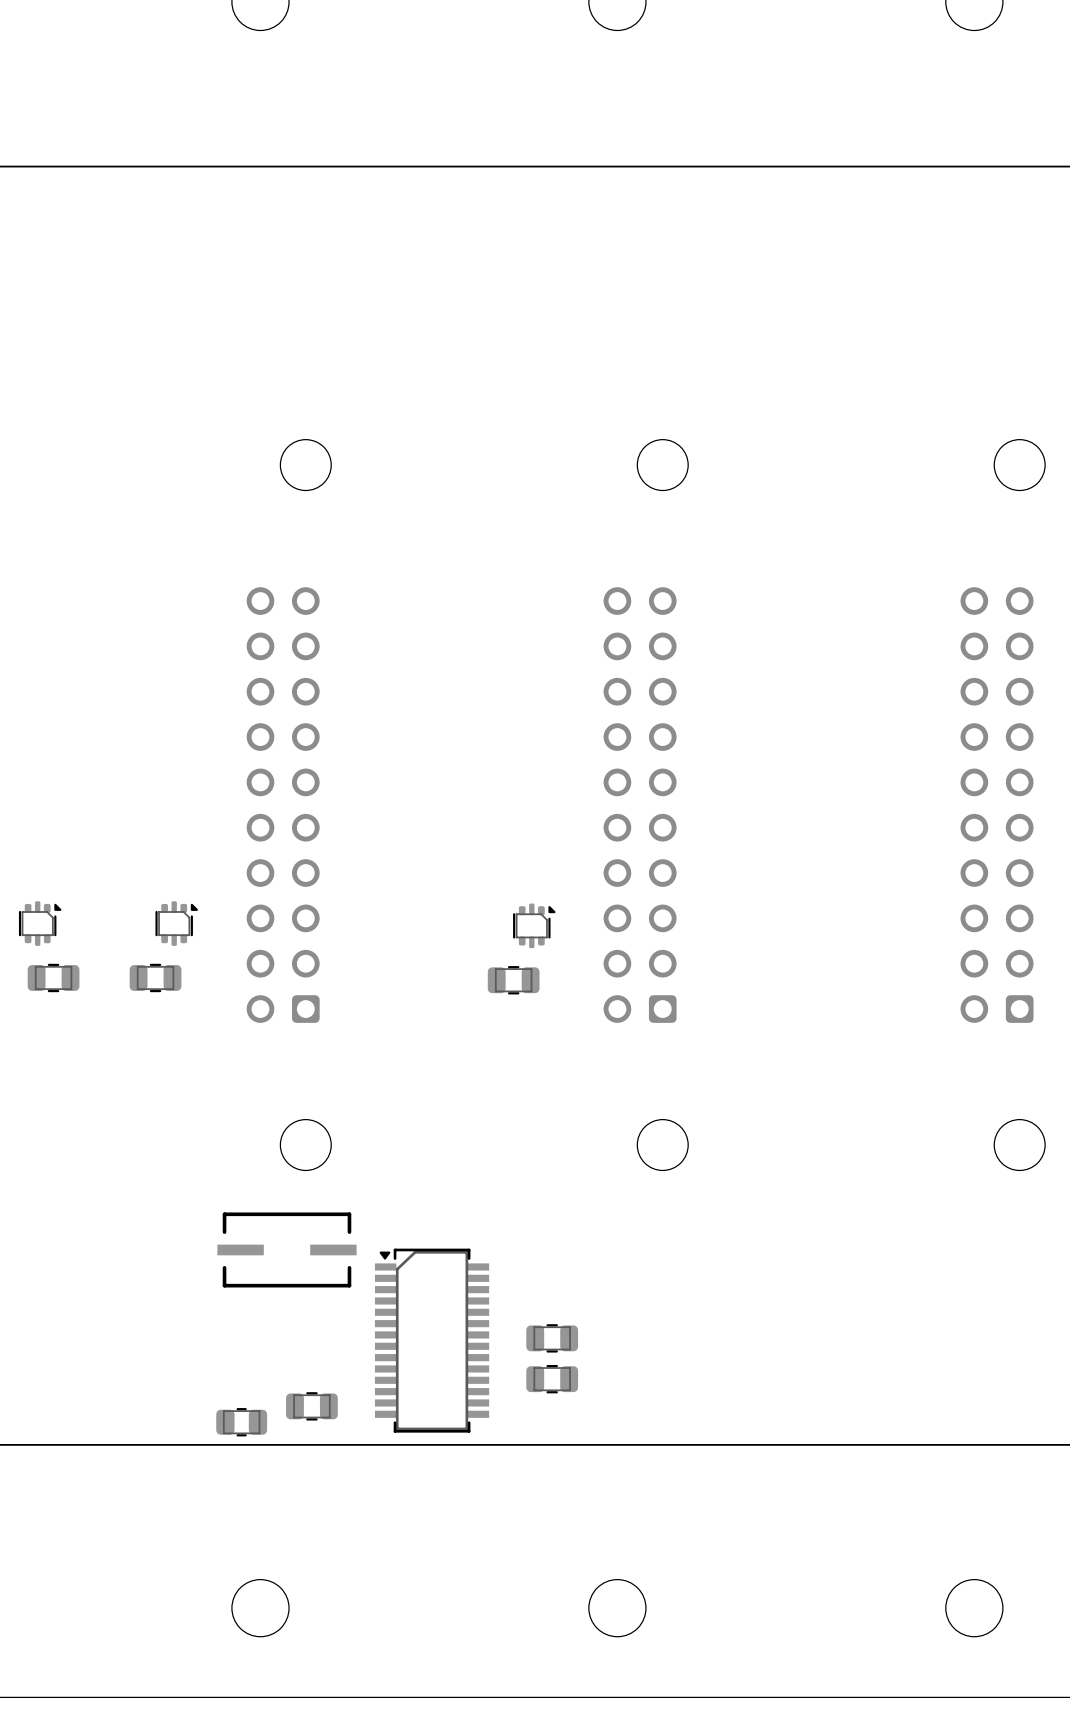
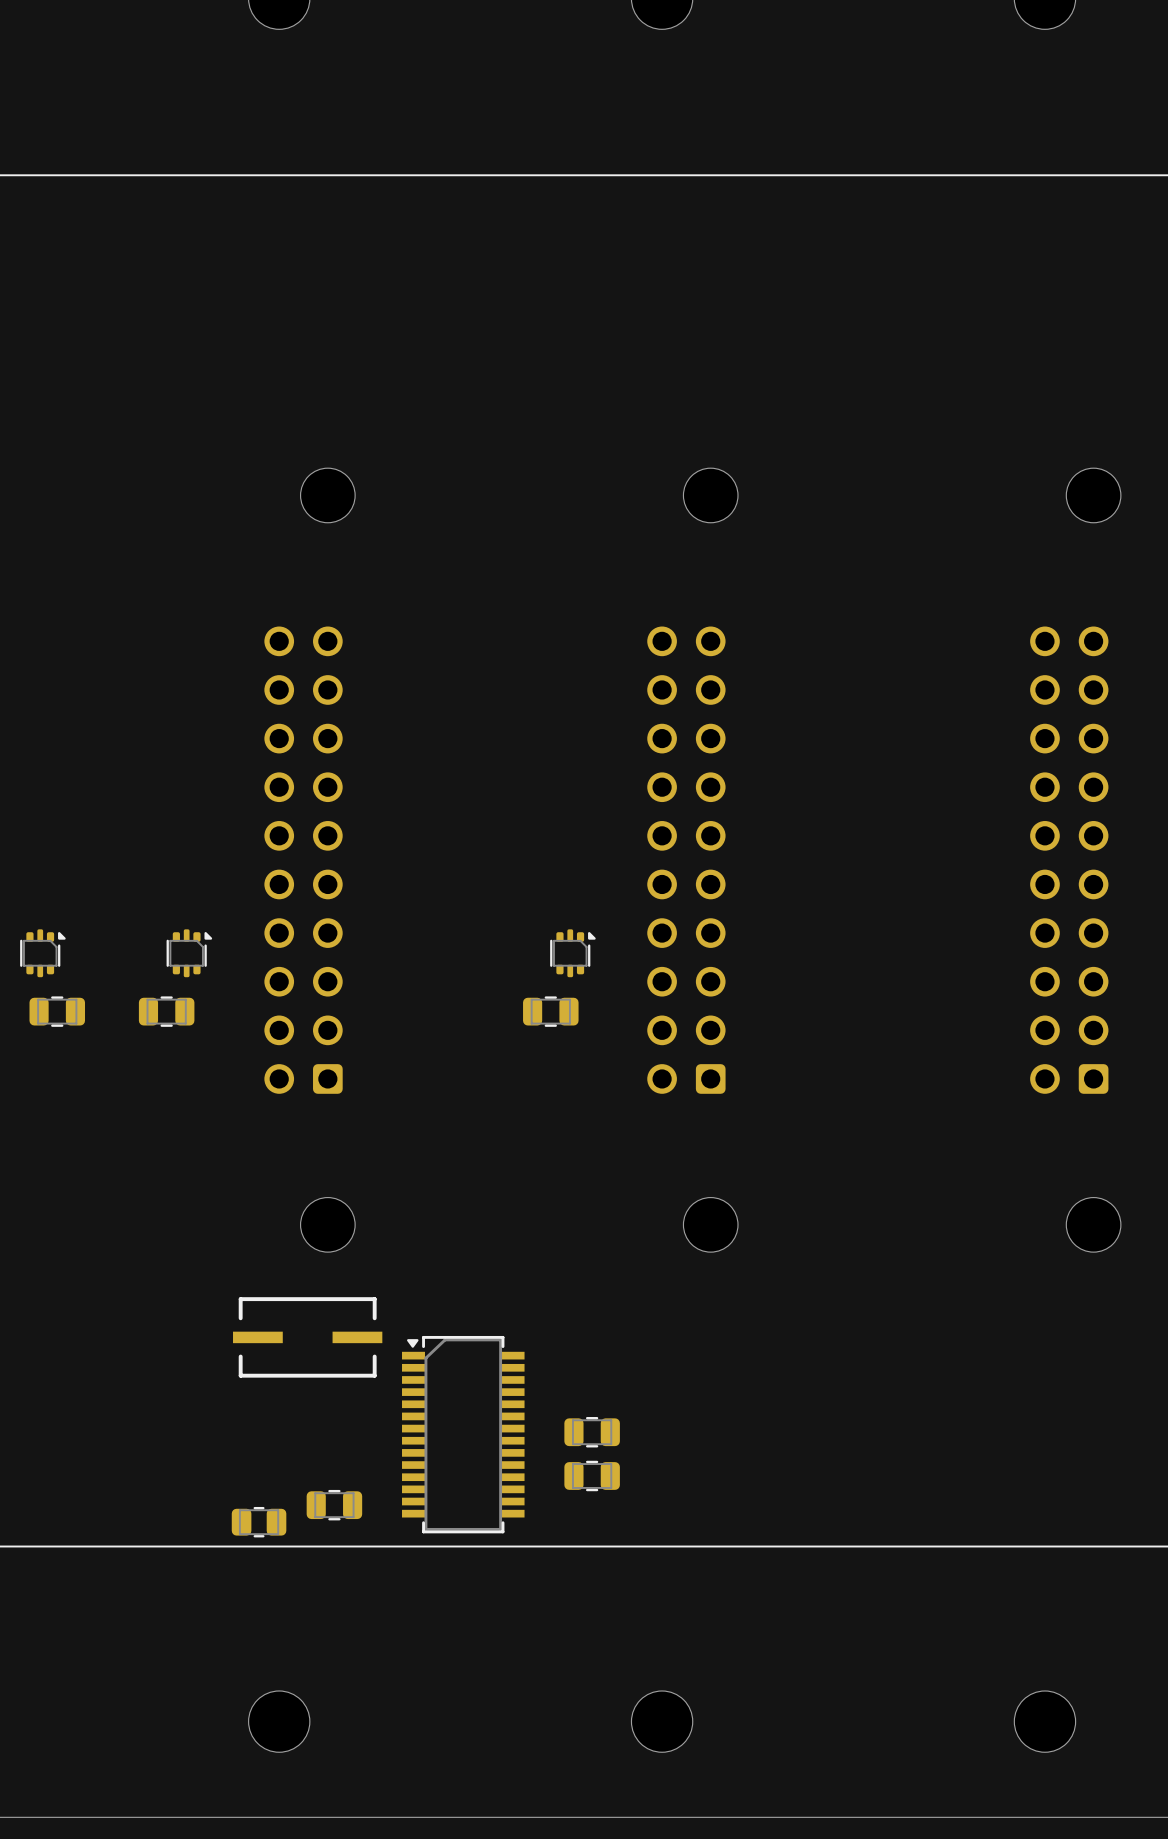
part position: (40, 923) -> (42, 953)
part position: (176, 923) -> (189, 953)
part position: (534, 925) -> (572, 953)
part position: (53, 977) -> (57, 1011)
part position: (155, 977) -> (166, 1011)
part position: (513, 980) -> (550, 1011)

